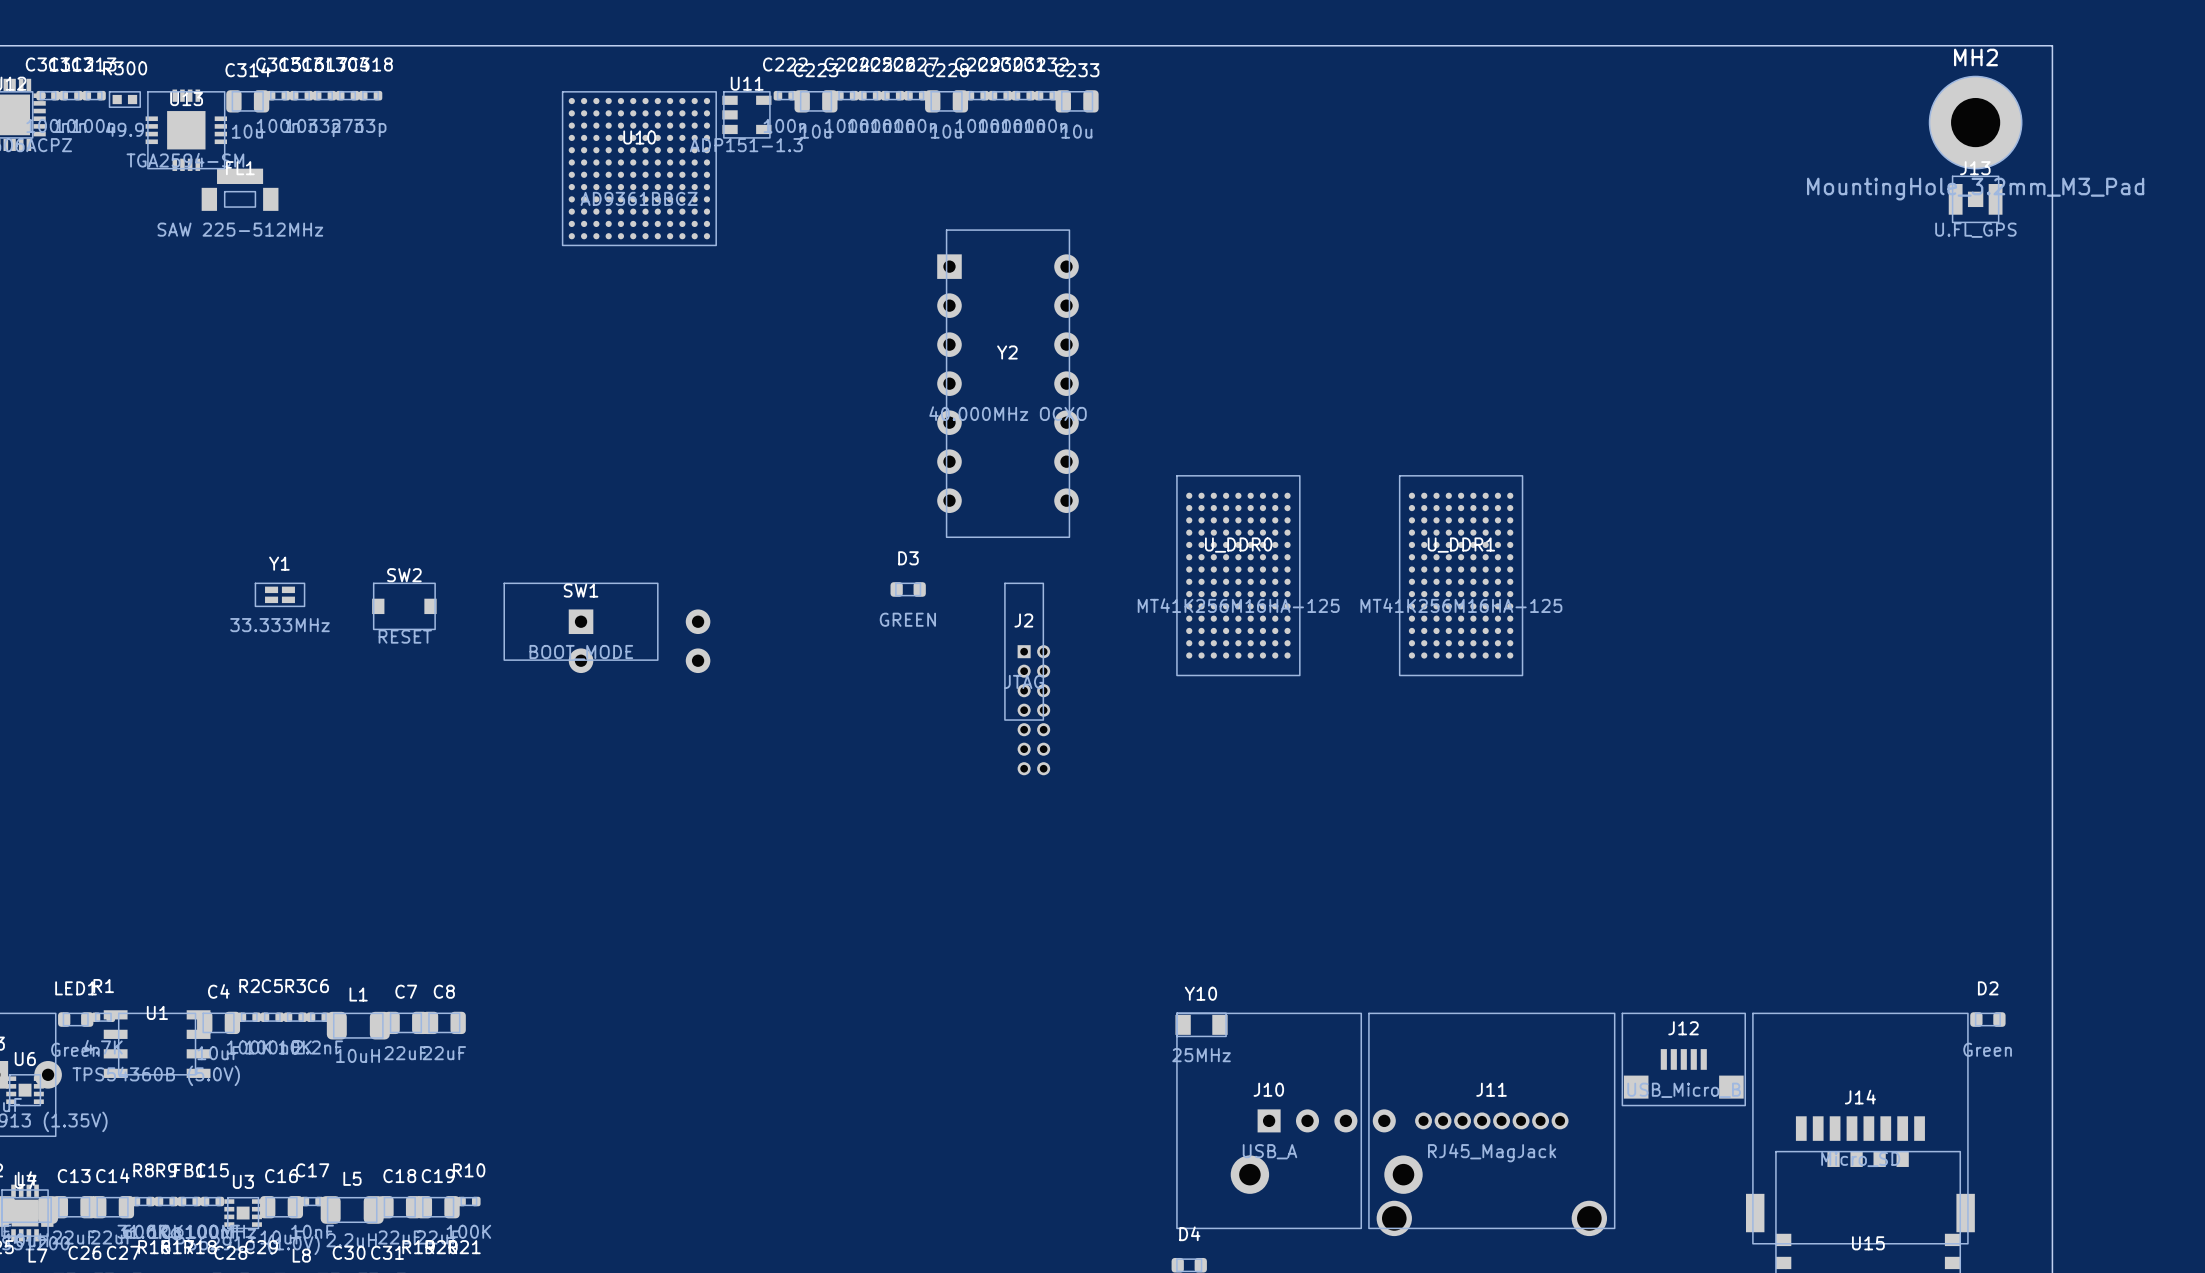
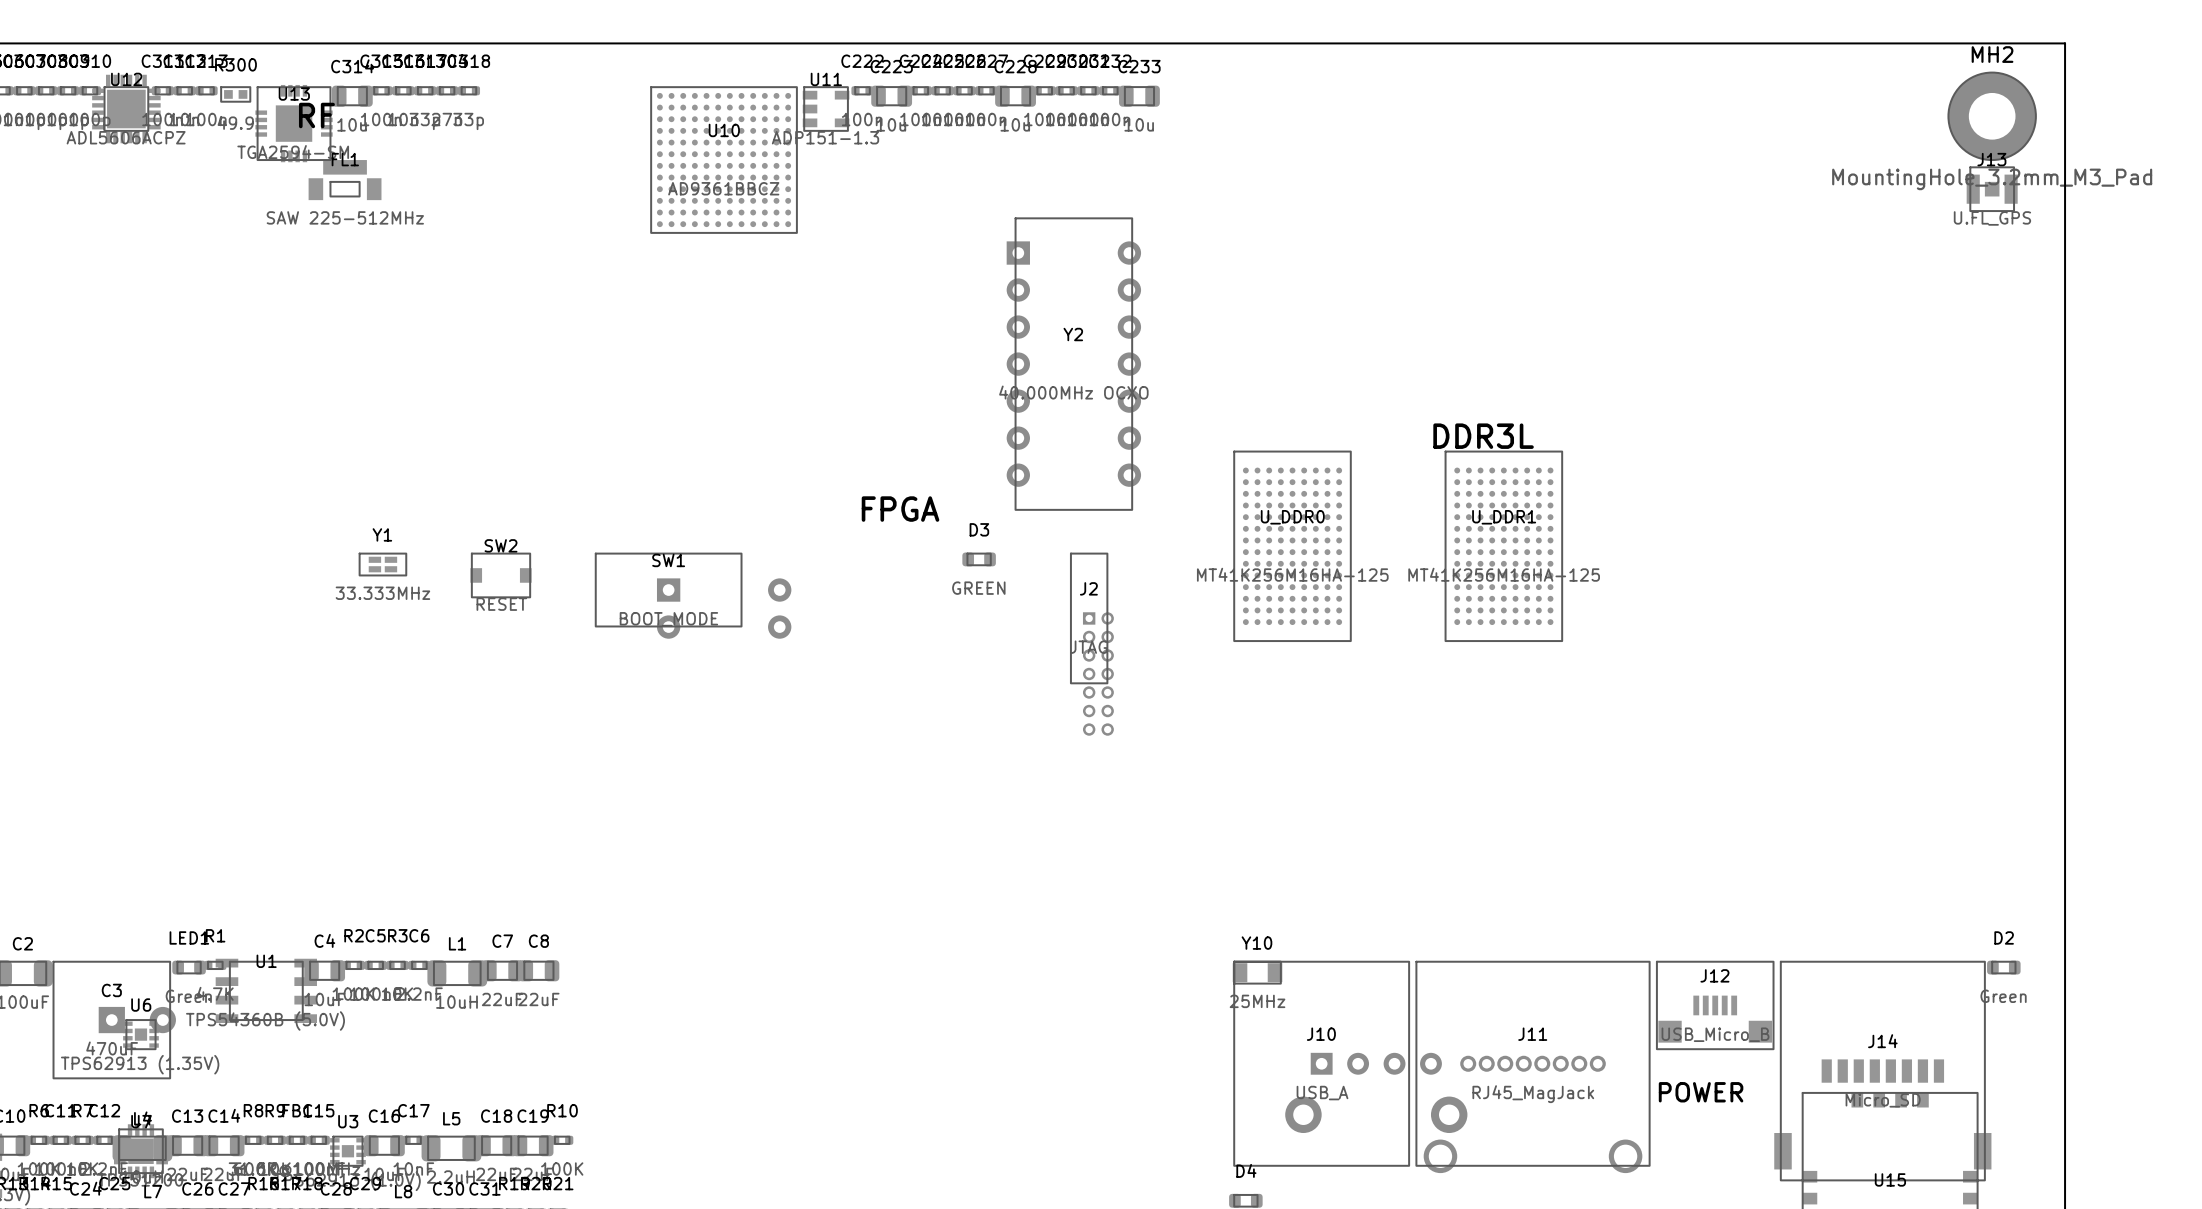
text: none -> RF (316, 115)
text: none -> DDR3L (1483, 436)
text: none -> FPGA (900, 509)
text: none -> POWER (1701, 1092)

